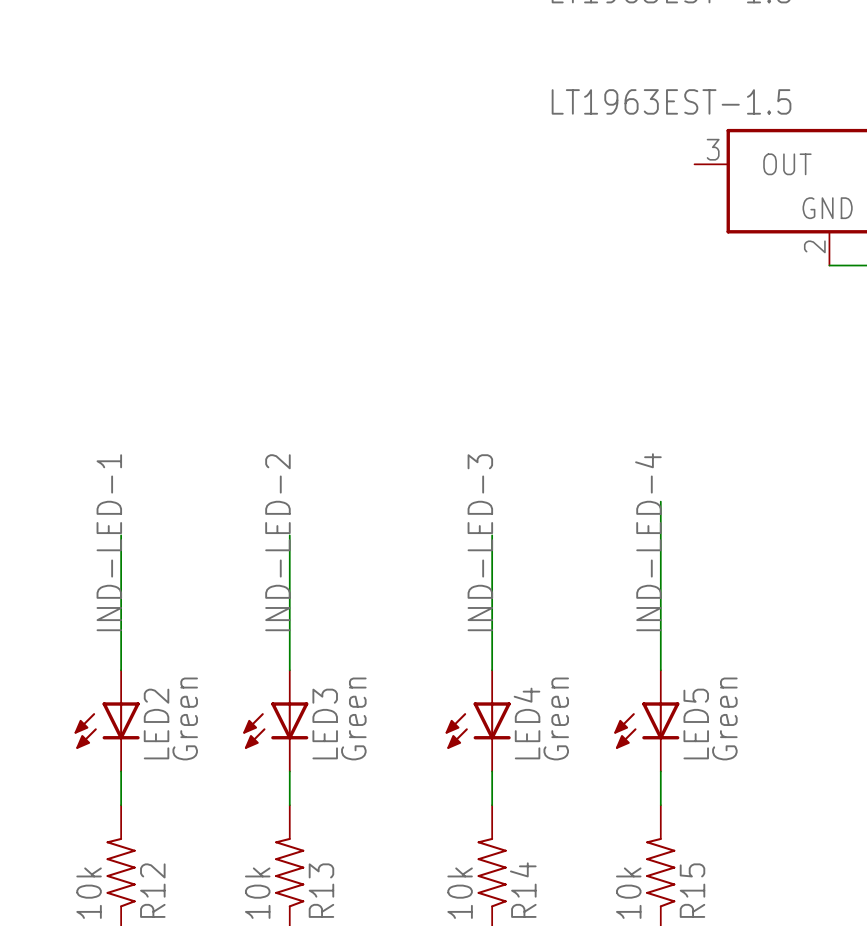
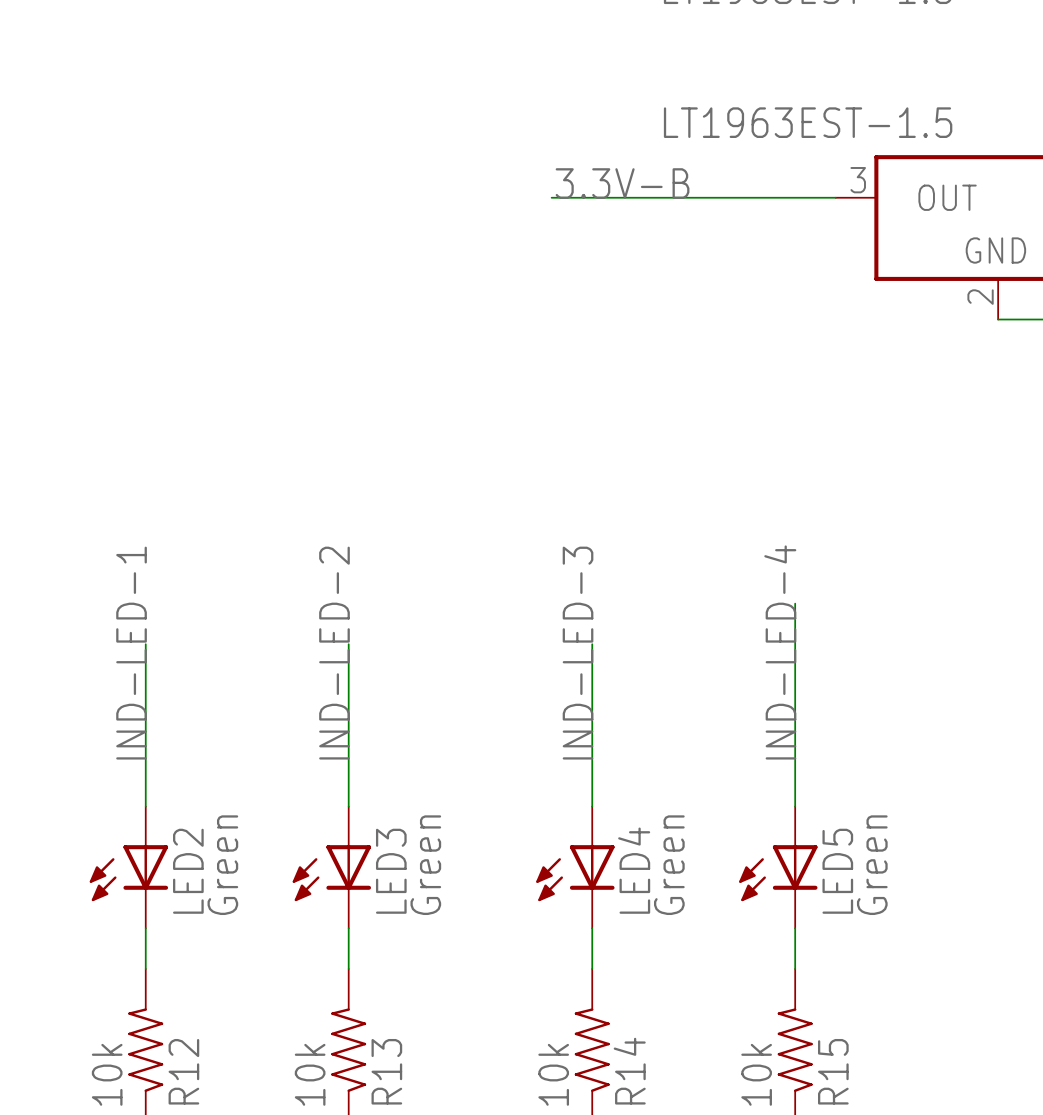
label: none -> 3.3V-B (622, 183)
wire: none -> (551, 197) (835, 197)

